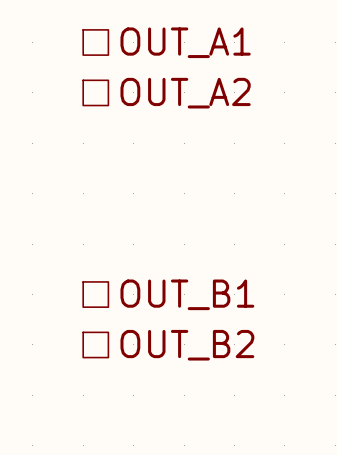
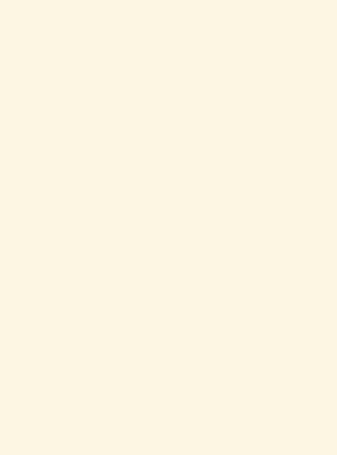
hierarchical label: OUT_A1 (185, 42) -> none
hierarchical label: OUT_A2 (185, 93) -> none
hierarchical label: OUT_B1 (187, 294) -> none
hierarchical label: OUT_B2 (187, 345) -> none

